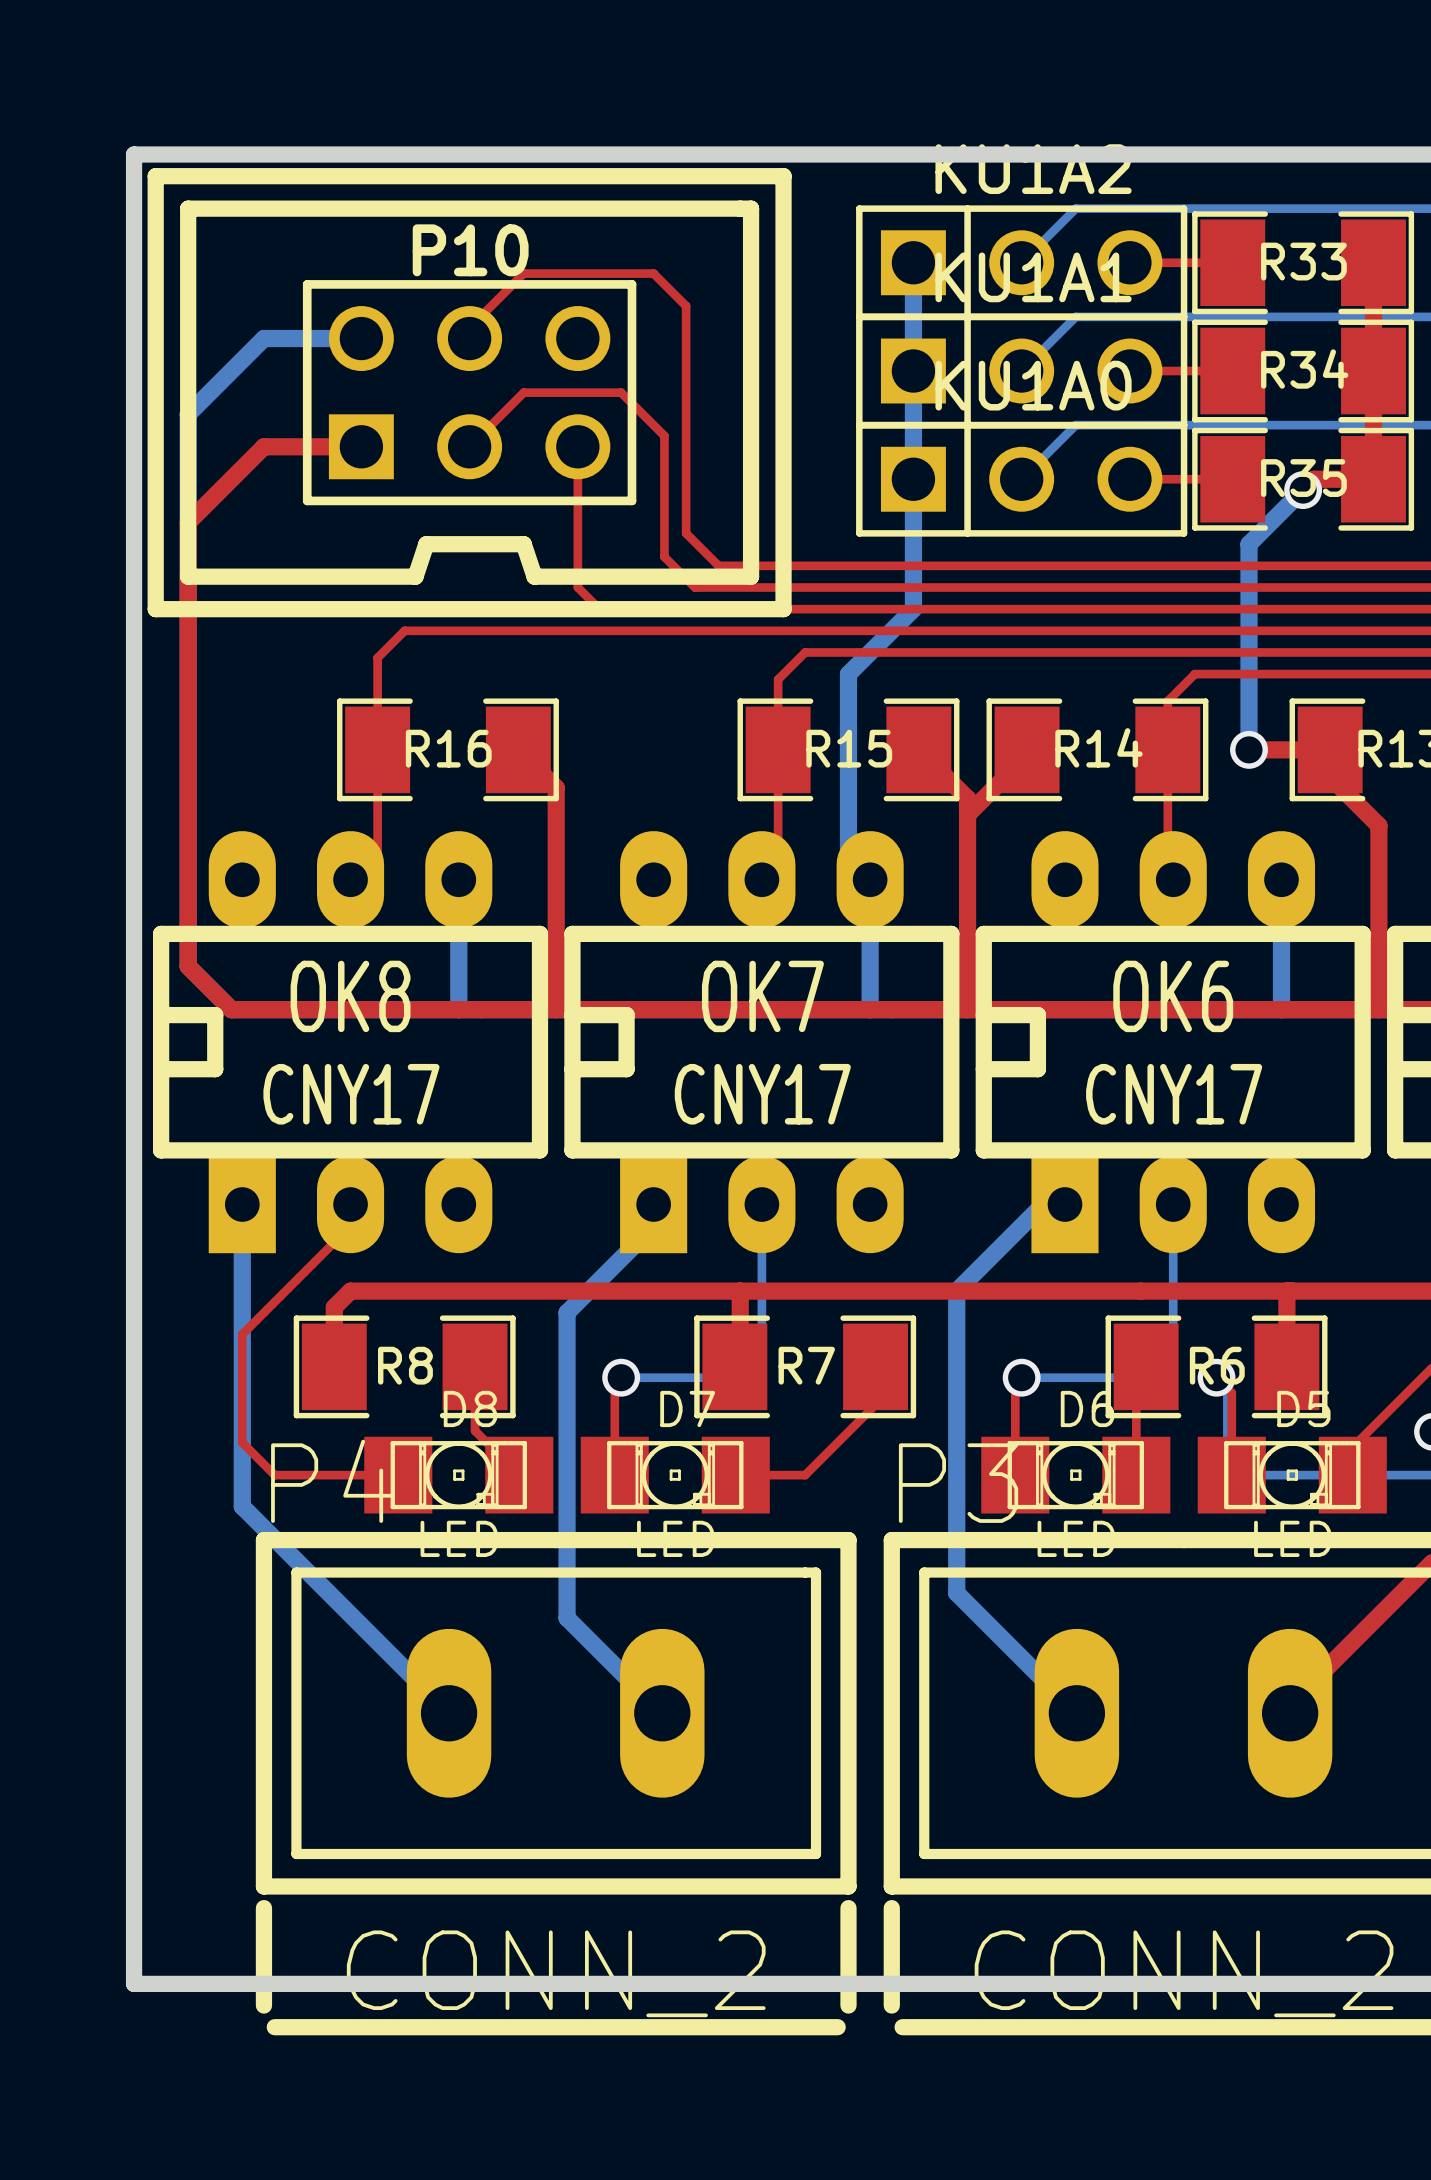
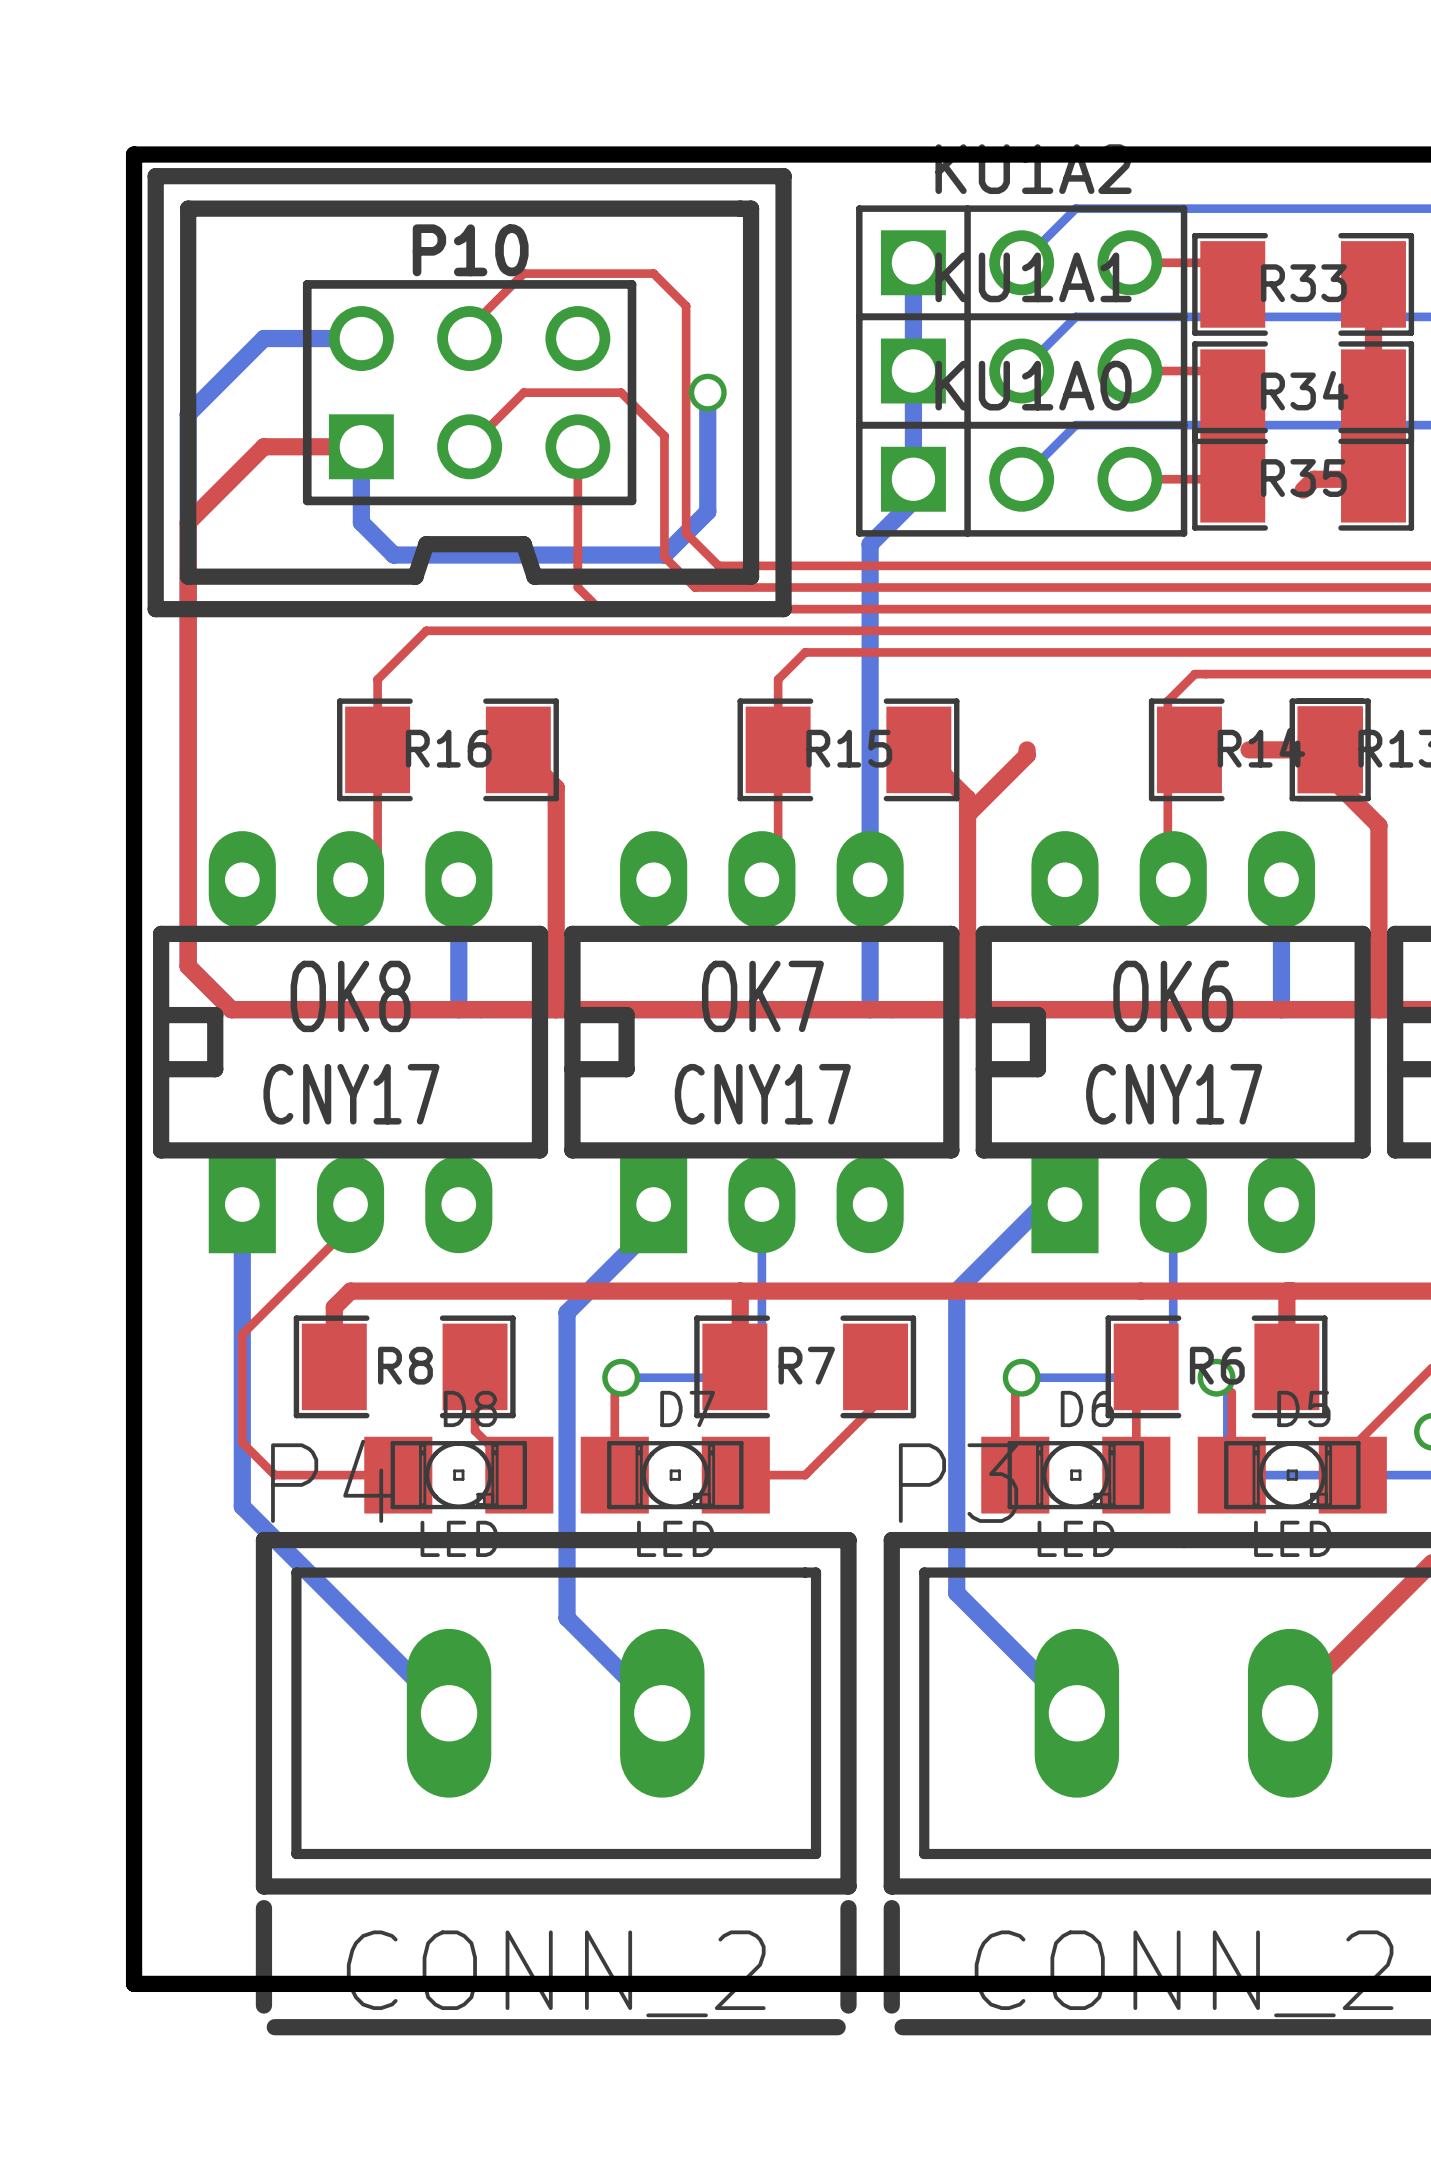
R33 position: (1303, 262) -> (1303, 284)
R34 position: (1303, 371) -> (1303, 392)
bottom track: none -> (707, 392) (707, 511) (664, 555) (393, 555) (361, 522) (361, 446)
via: none -> (707, 392)
bottom track: (1303, 490) (1249, 544) (1249, 749) -> none
via: (1303, 490) -> none
bottom track: (913, 500) (913, 609) (848, 674) (848, 858) (870, 879) -> (913, 500) (870, 544) (870, 879)
top track: (426, 630) (404, 630) (377, 657) (377, 679) -> (426, 630) (377, 679)
R14 position: (1097, 749) -> (1259, 749)
via: (1249, 749) -> none

